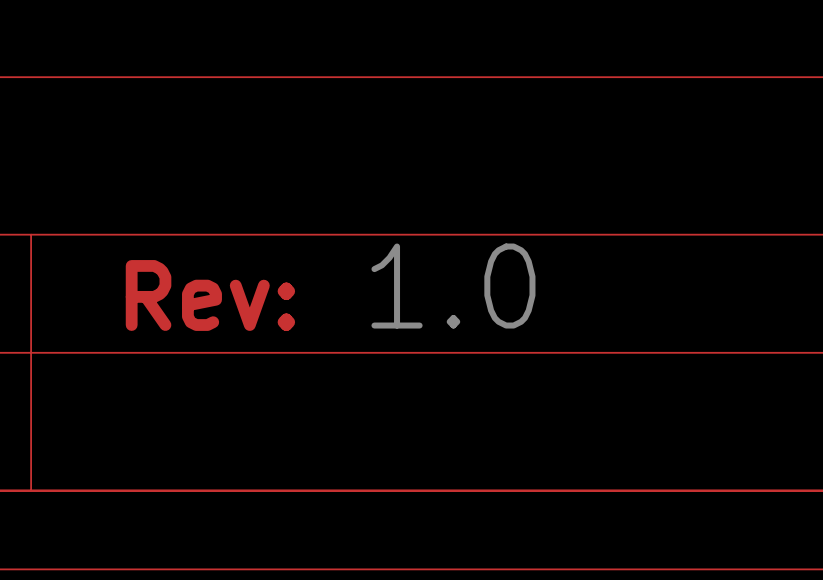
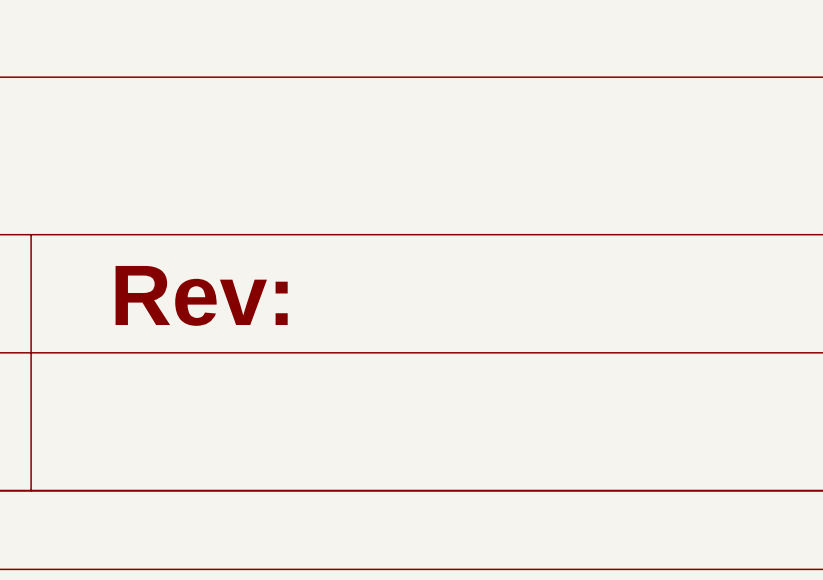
text: 1.0 (453, 286) -> none

